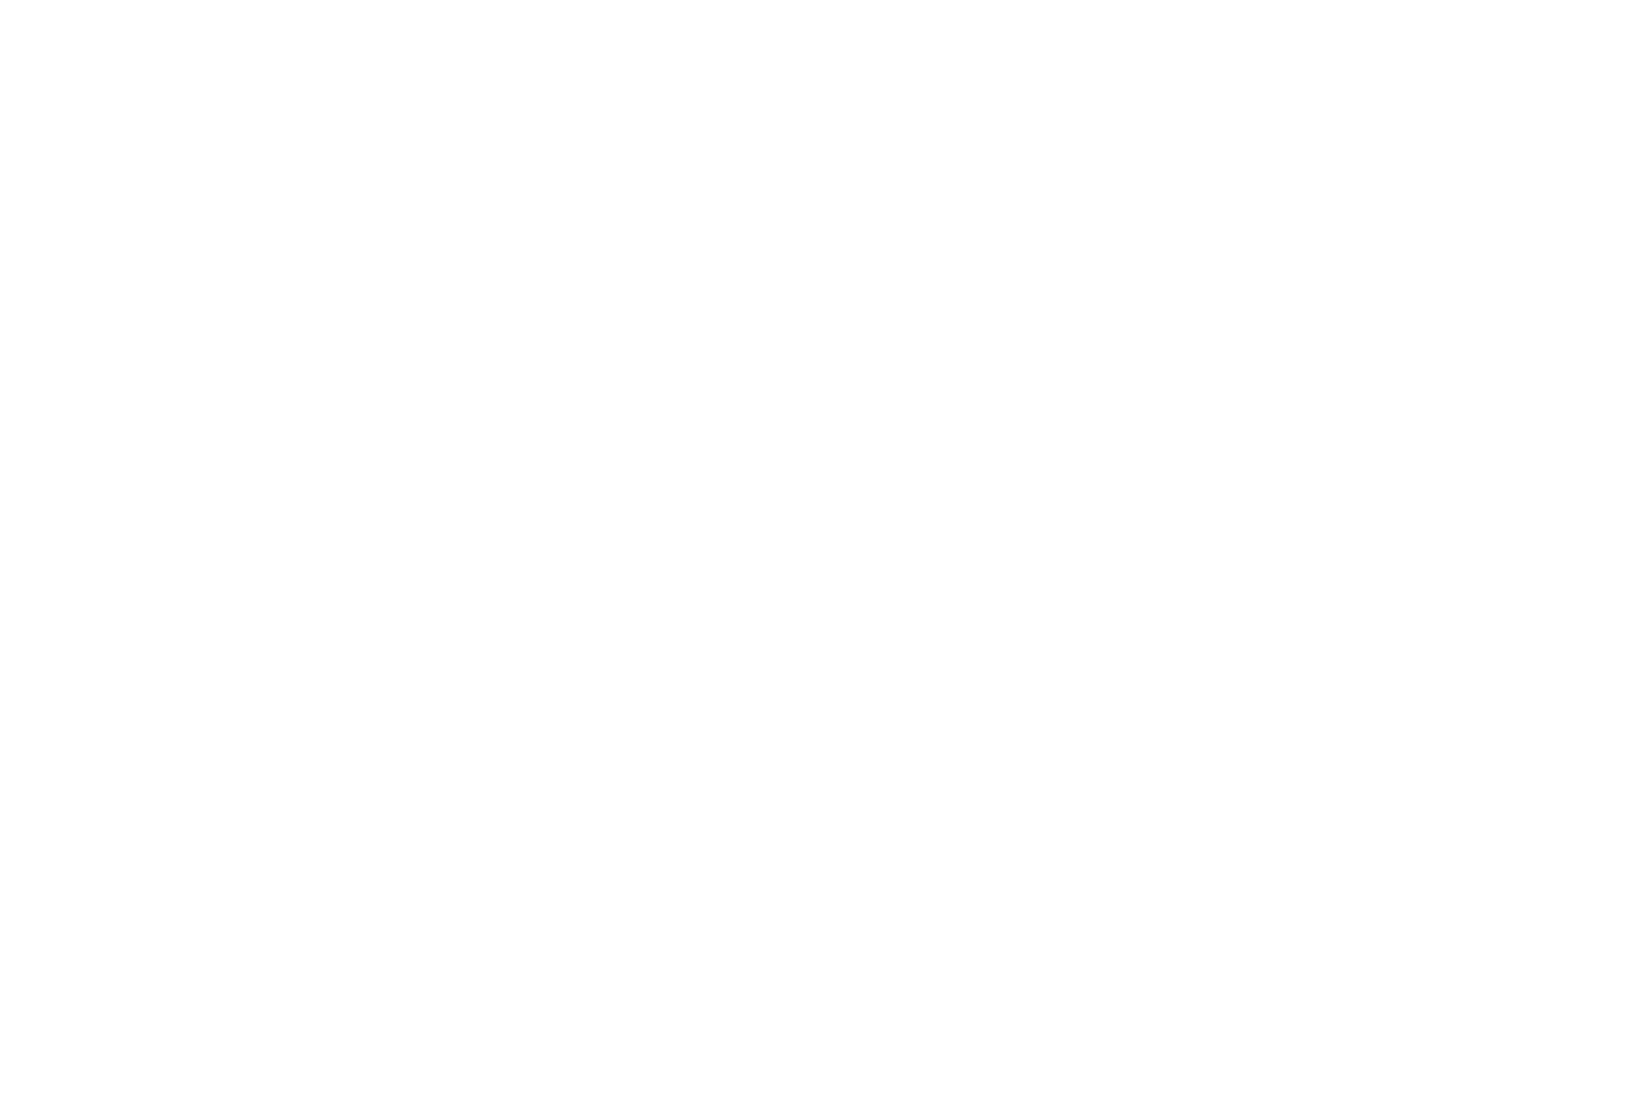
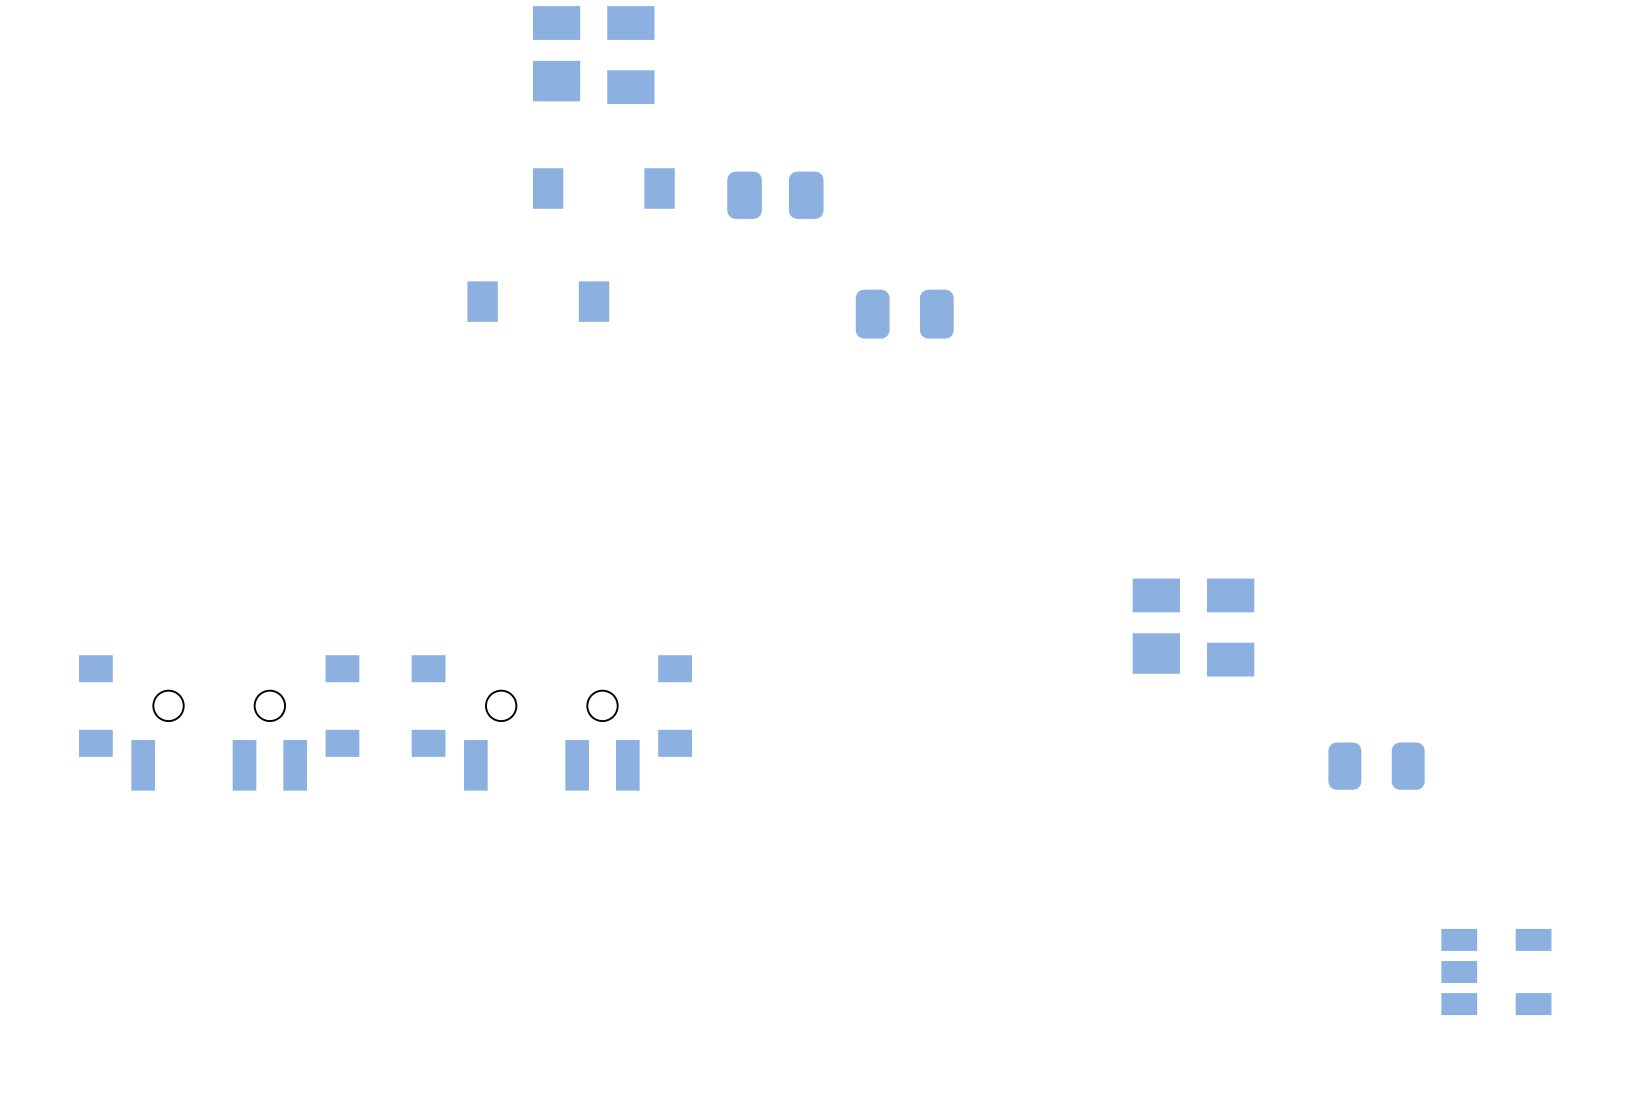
part: none -> (593, 55)
part: none -> (603, 188)
part: none -> (775, 195)
part: none -> (538, 301)
part: none -> (904, 314)
part: none -> (1193, 627)
part: none -> (219, 722)
part: none -> (551, 722)
part: none -> (1376, 766)
part: none -> (1496, 972)

